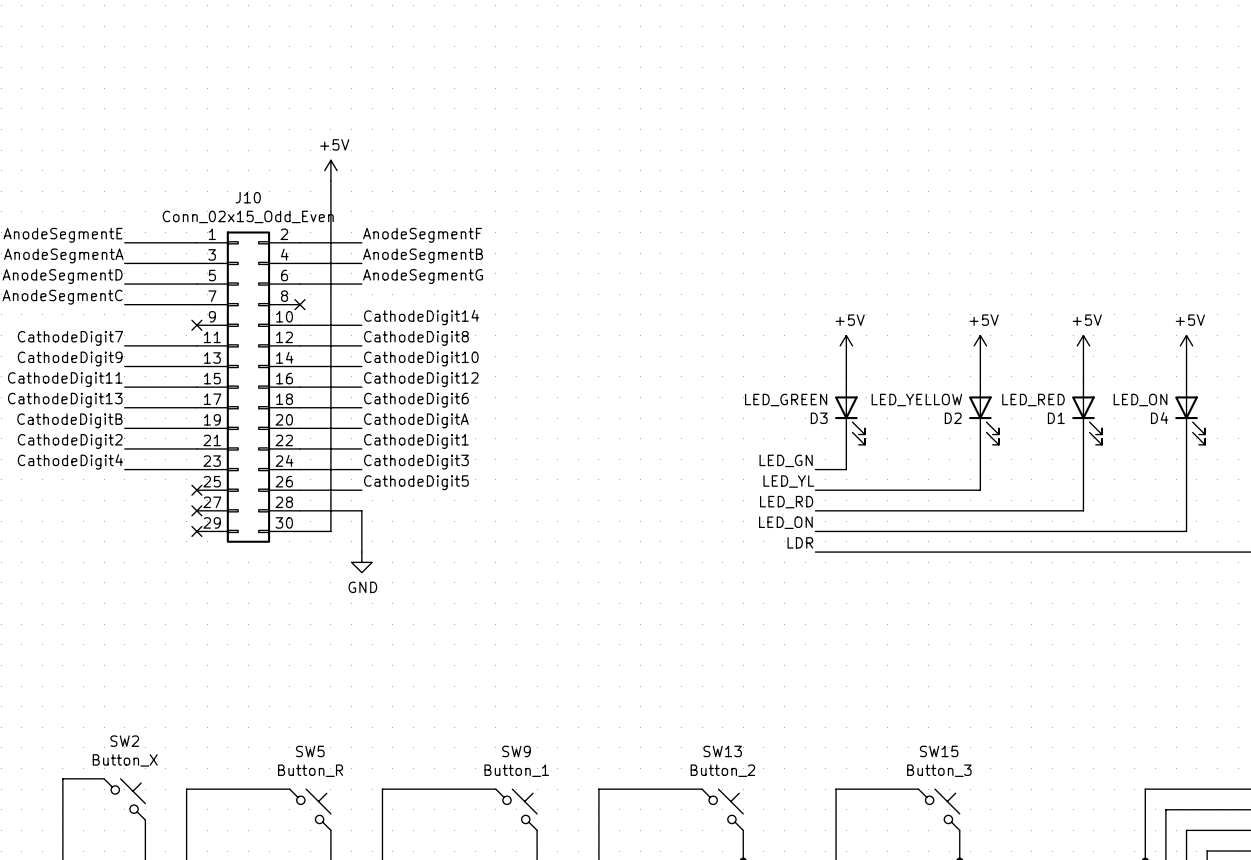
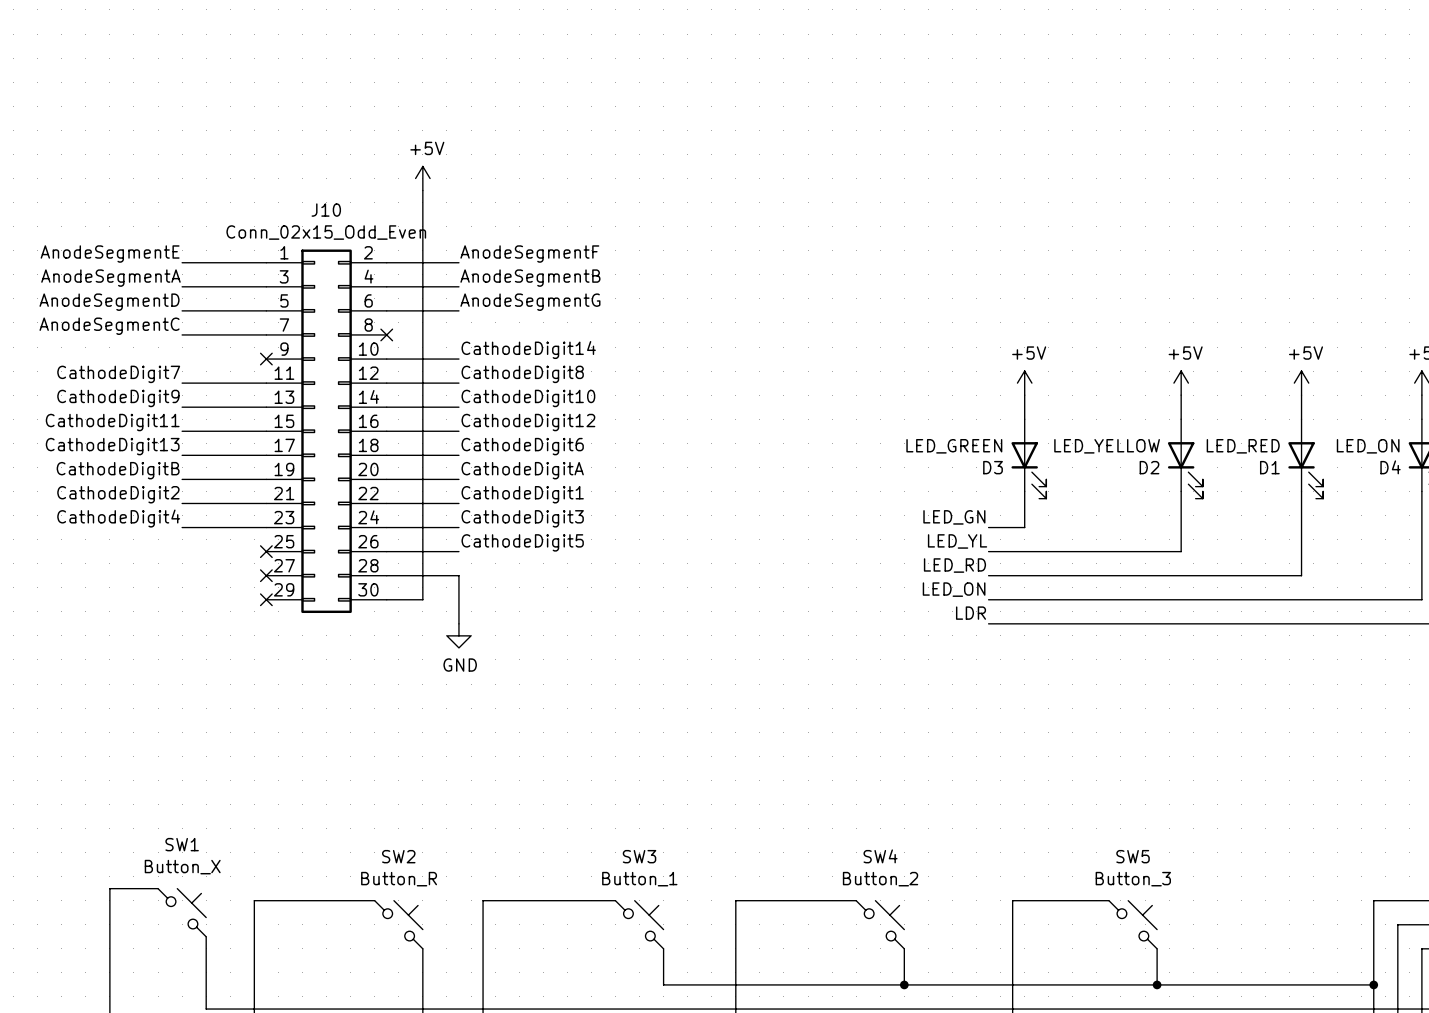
SW2 name: SW2 (124, 741) -> SW1 (182, 844)
SW5 name: SW5 (310, 751) -> SW2 (398, 856)
SW9 name: SW9 (516, 751) -> SW3 (639, 856)
SW13 name: SW13 (722, 751) -> SW4 (880, 856)
SW15 name: SW15 (939, 751) -> SW5 (1133, 856)

